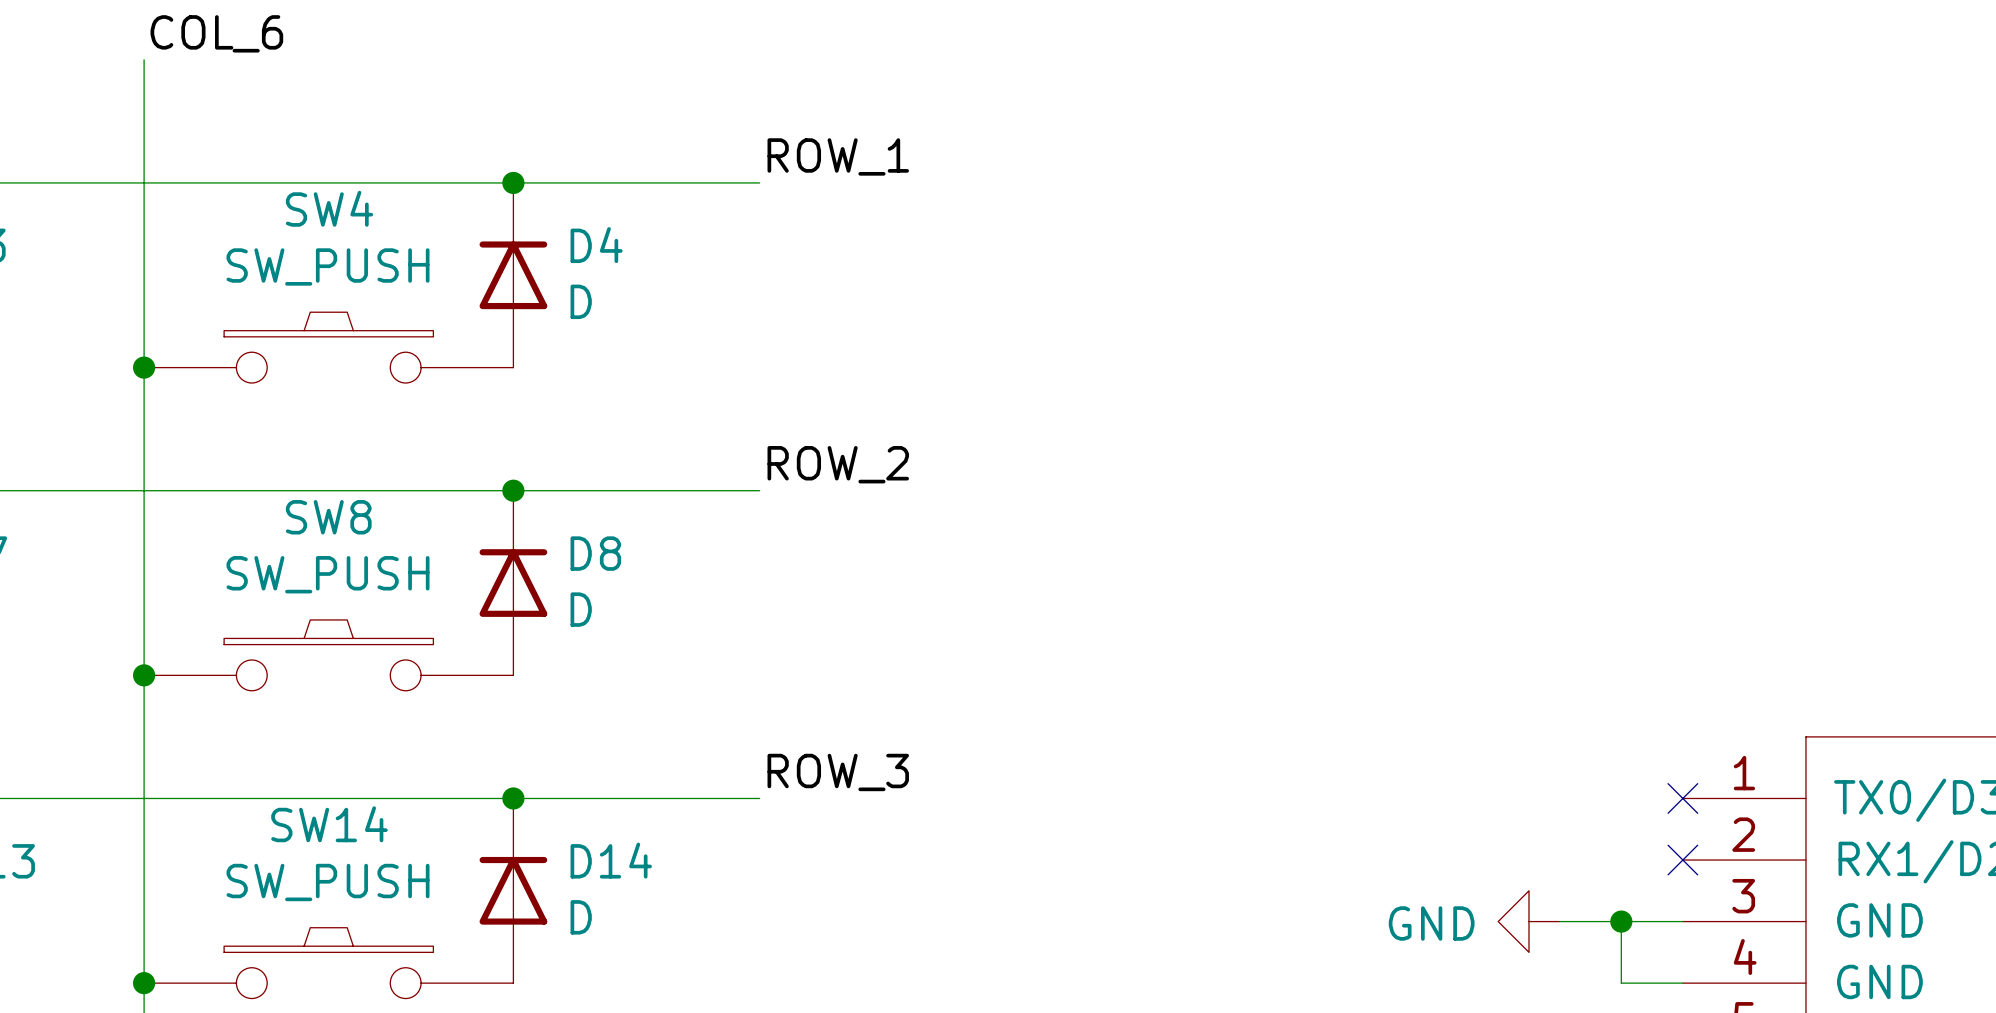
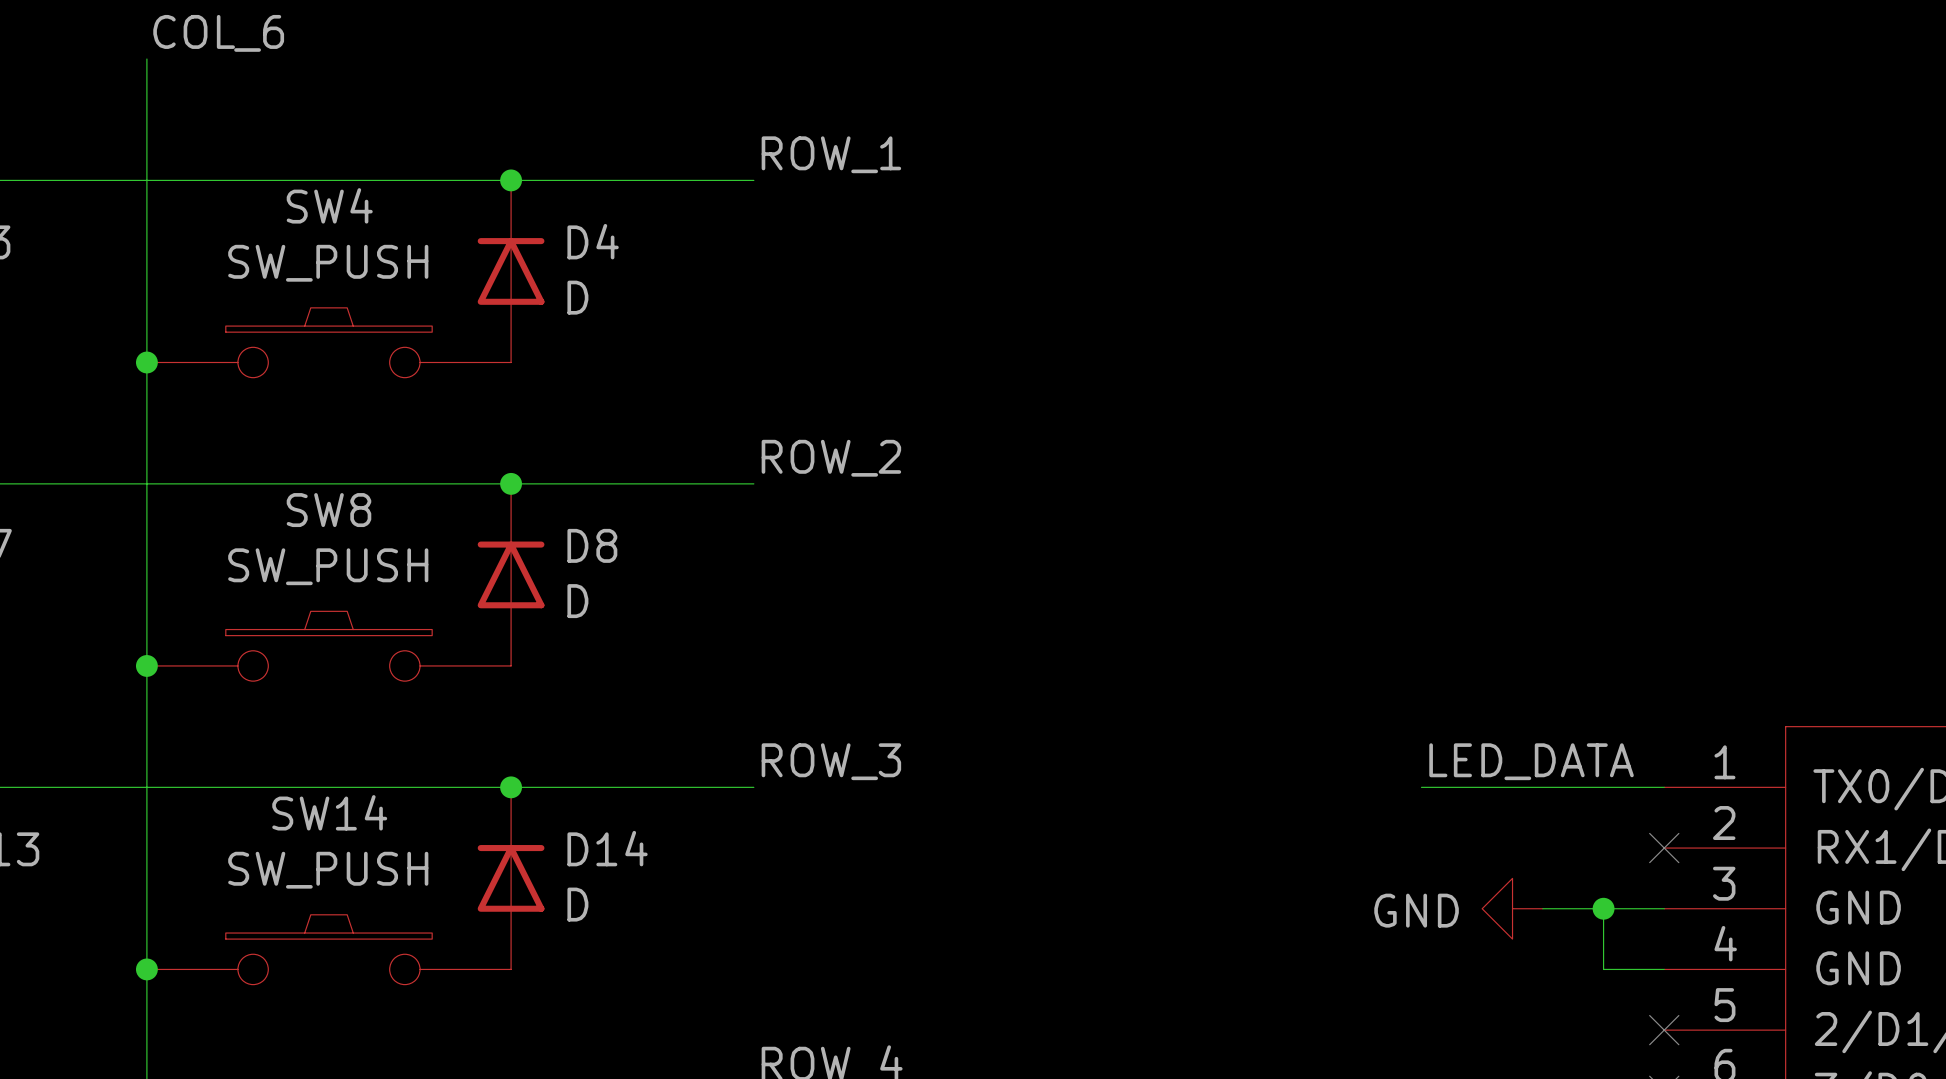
label: none -> LED_DATA (1531, 761)
wire: none -> (1421, 787) (1664, 787)
no-connect mark: (1682, 798) -> none

